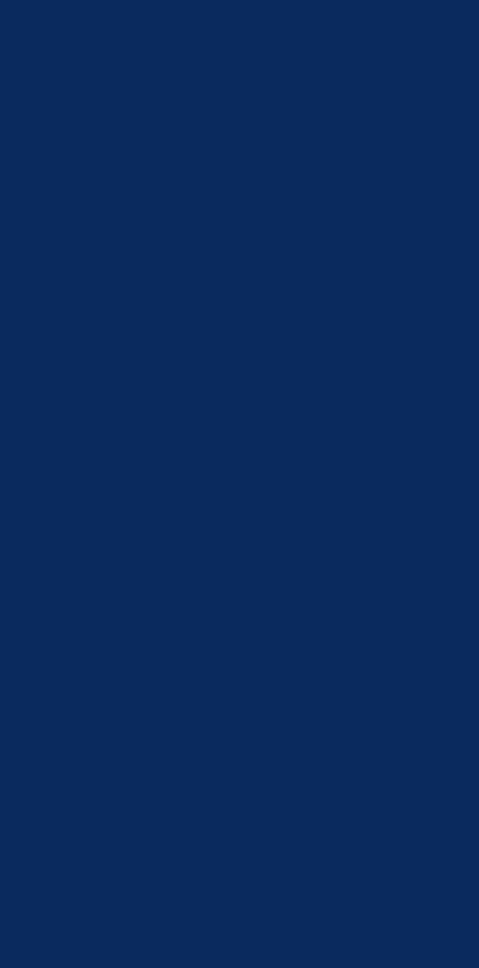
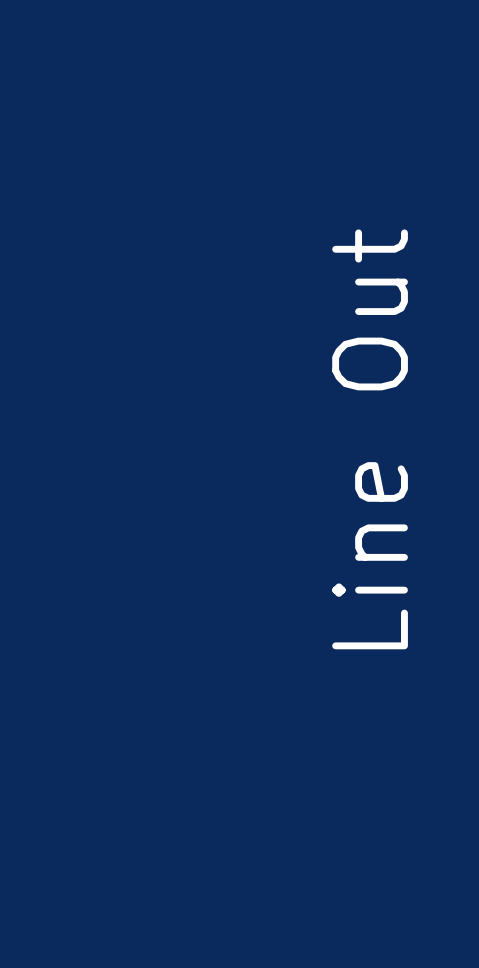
text: none -> Line Out (370, 439)

